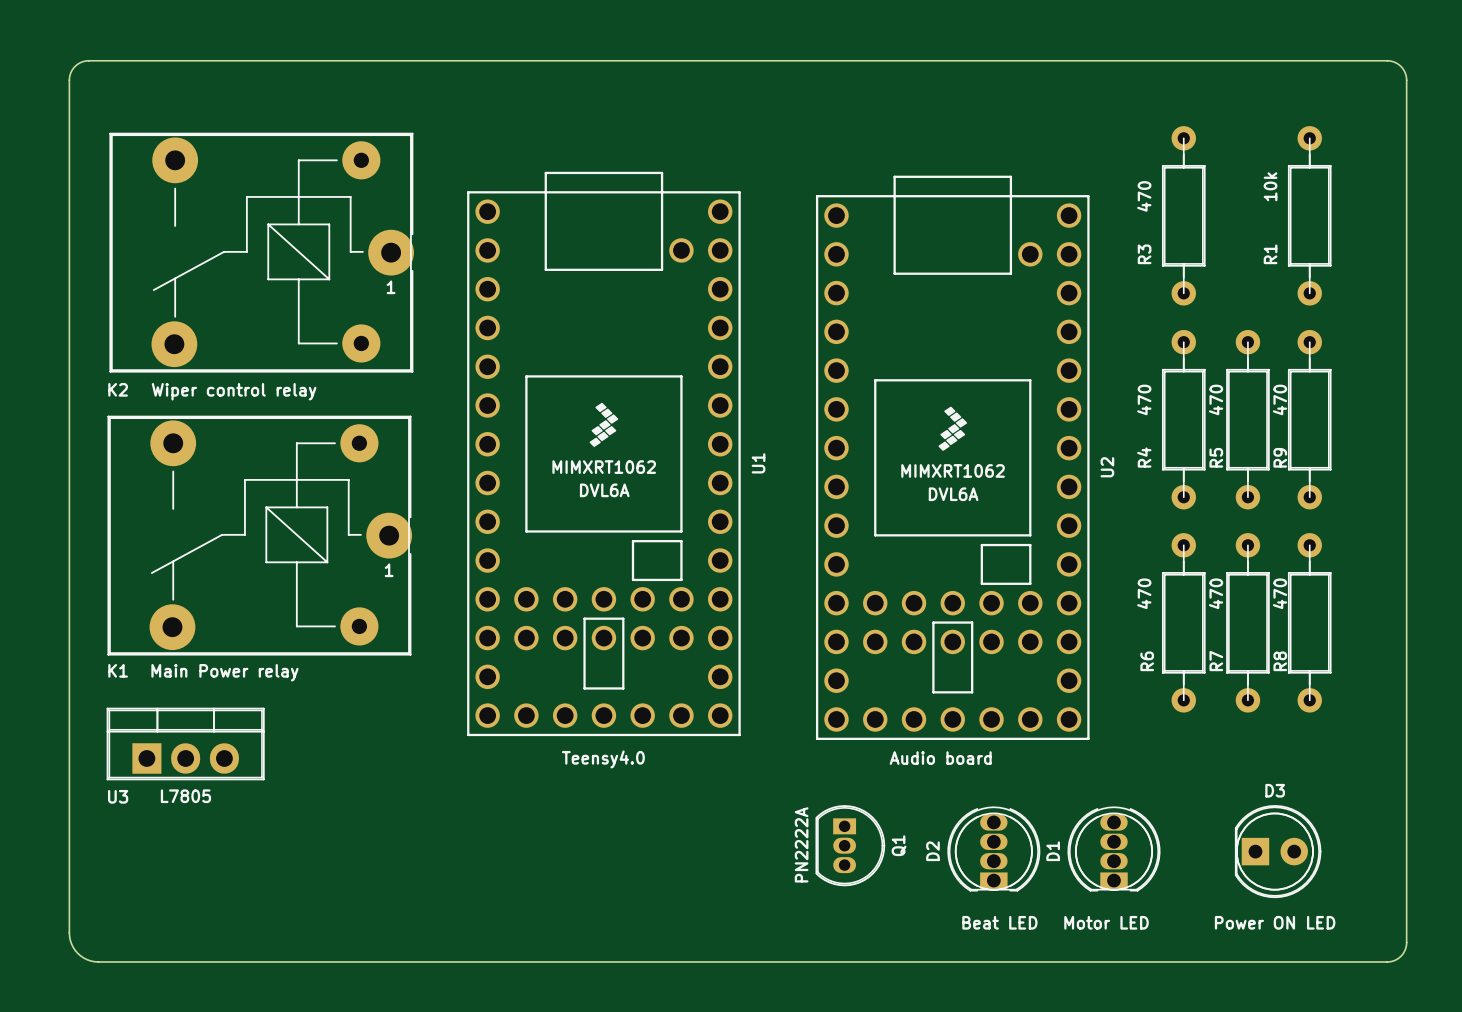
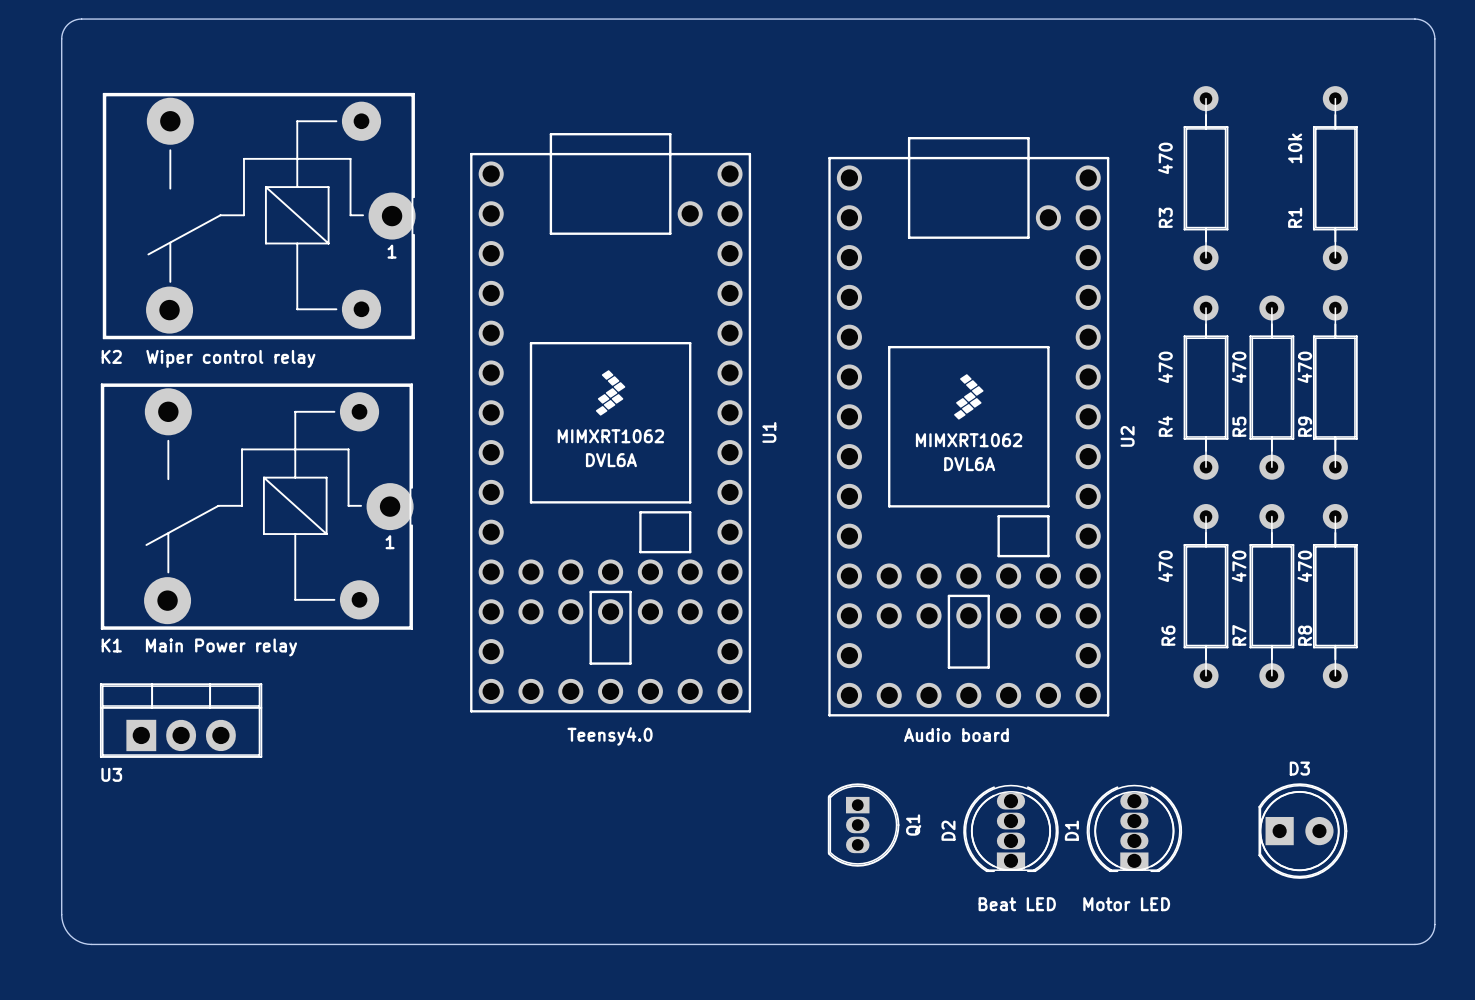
U3 value: L7805 (185, 796) -> none
Q1 value: PN2222A (801, 844) -> none
D3 value: Power ON LED (1275, 922) -> none

